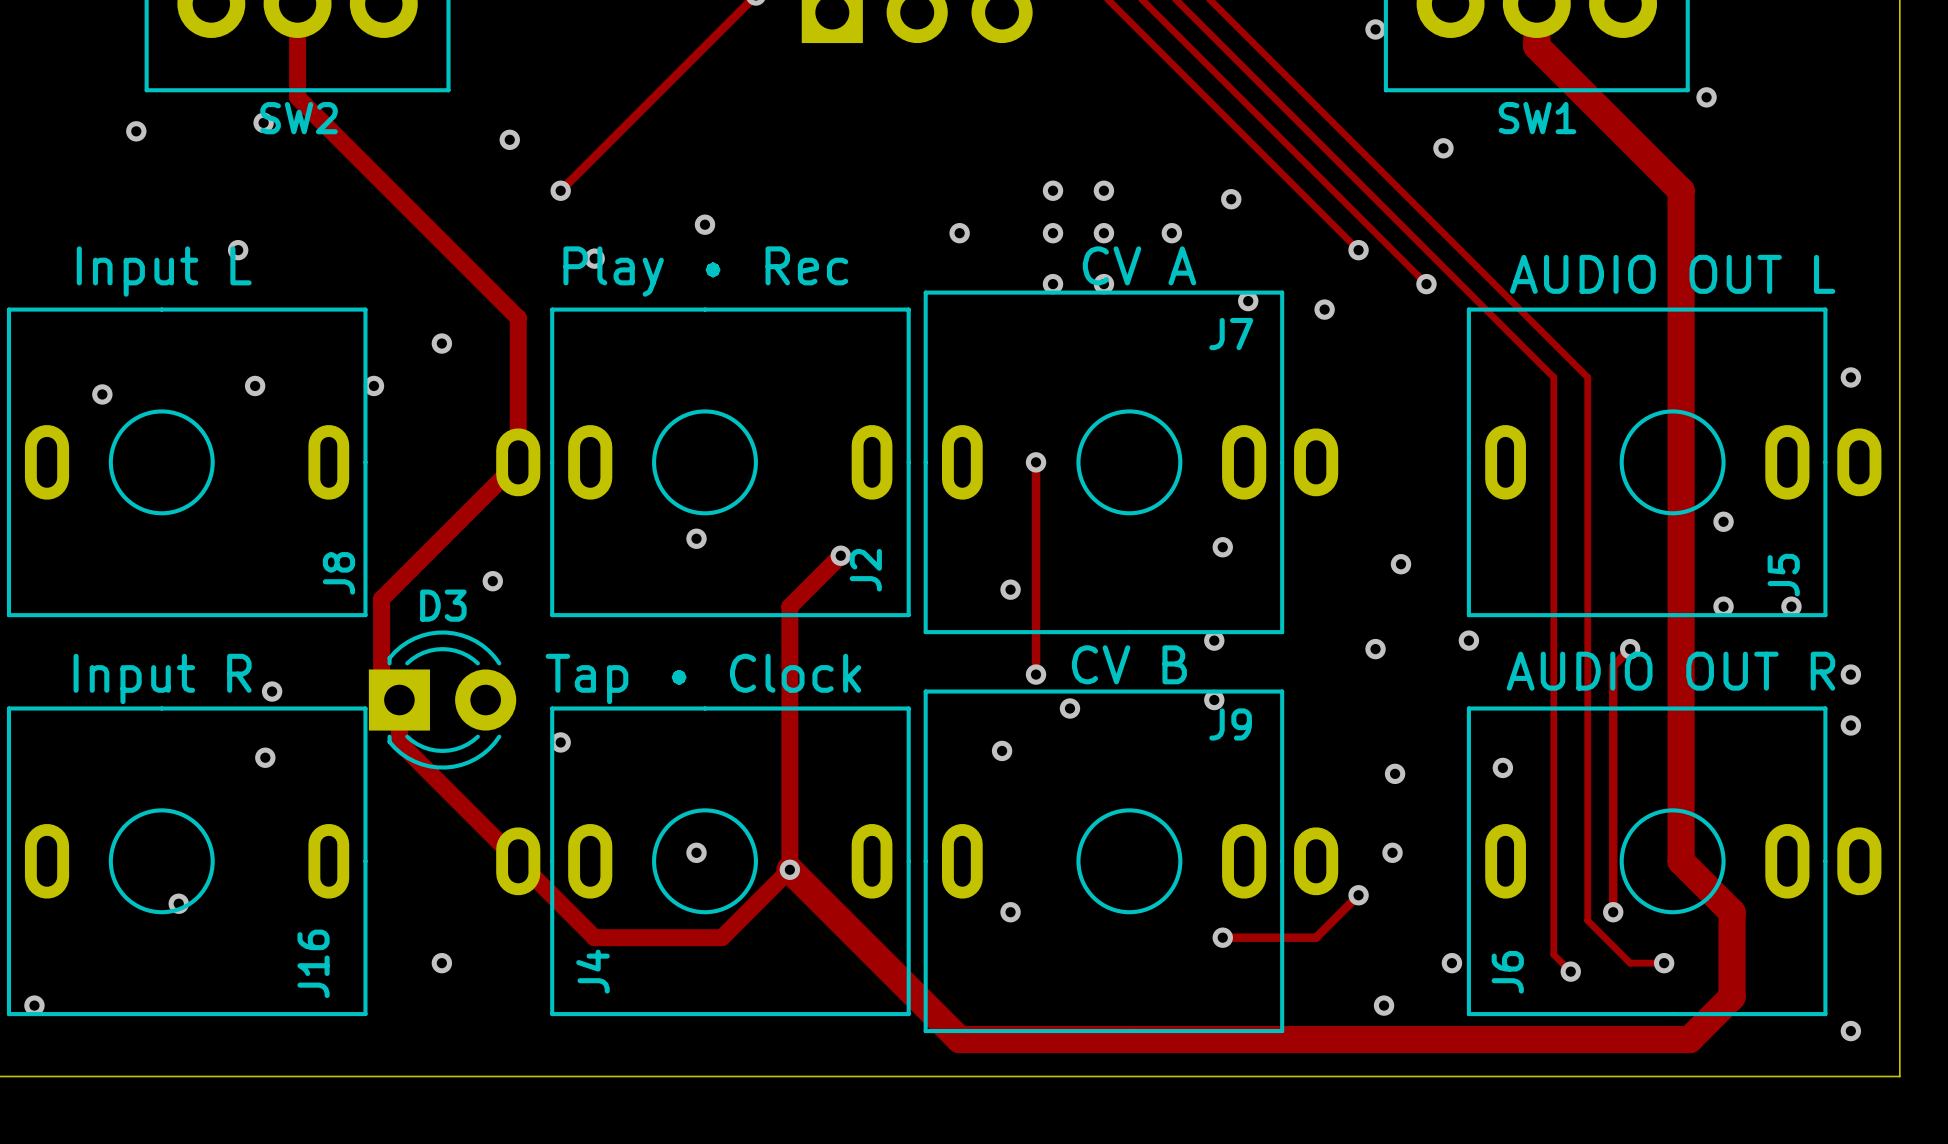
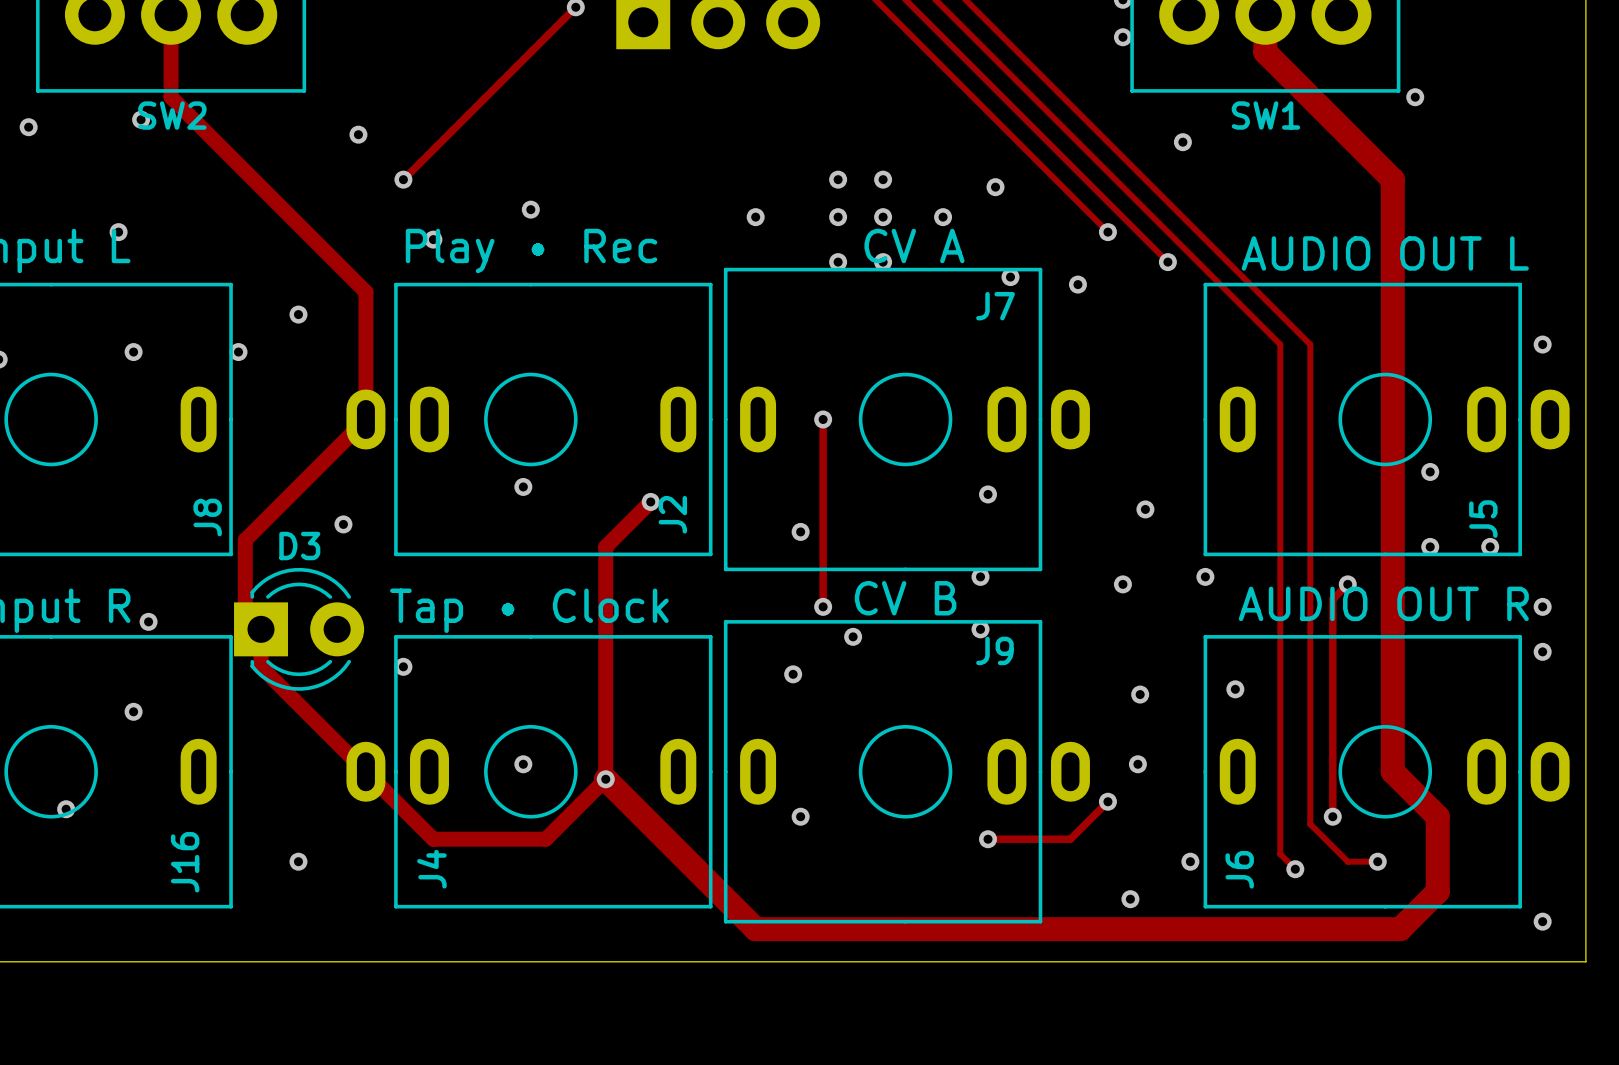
via position: (265, 757) -> (133, 711)

